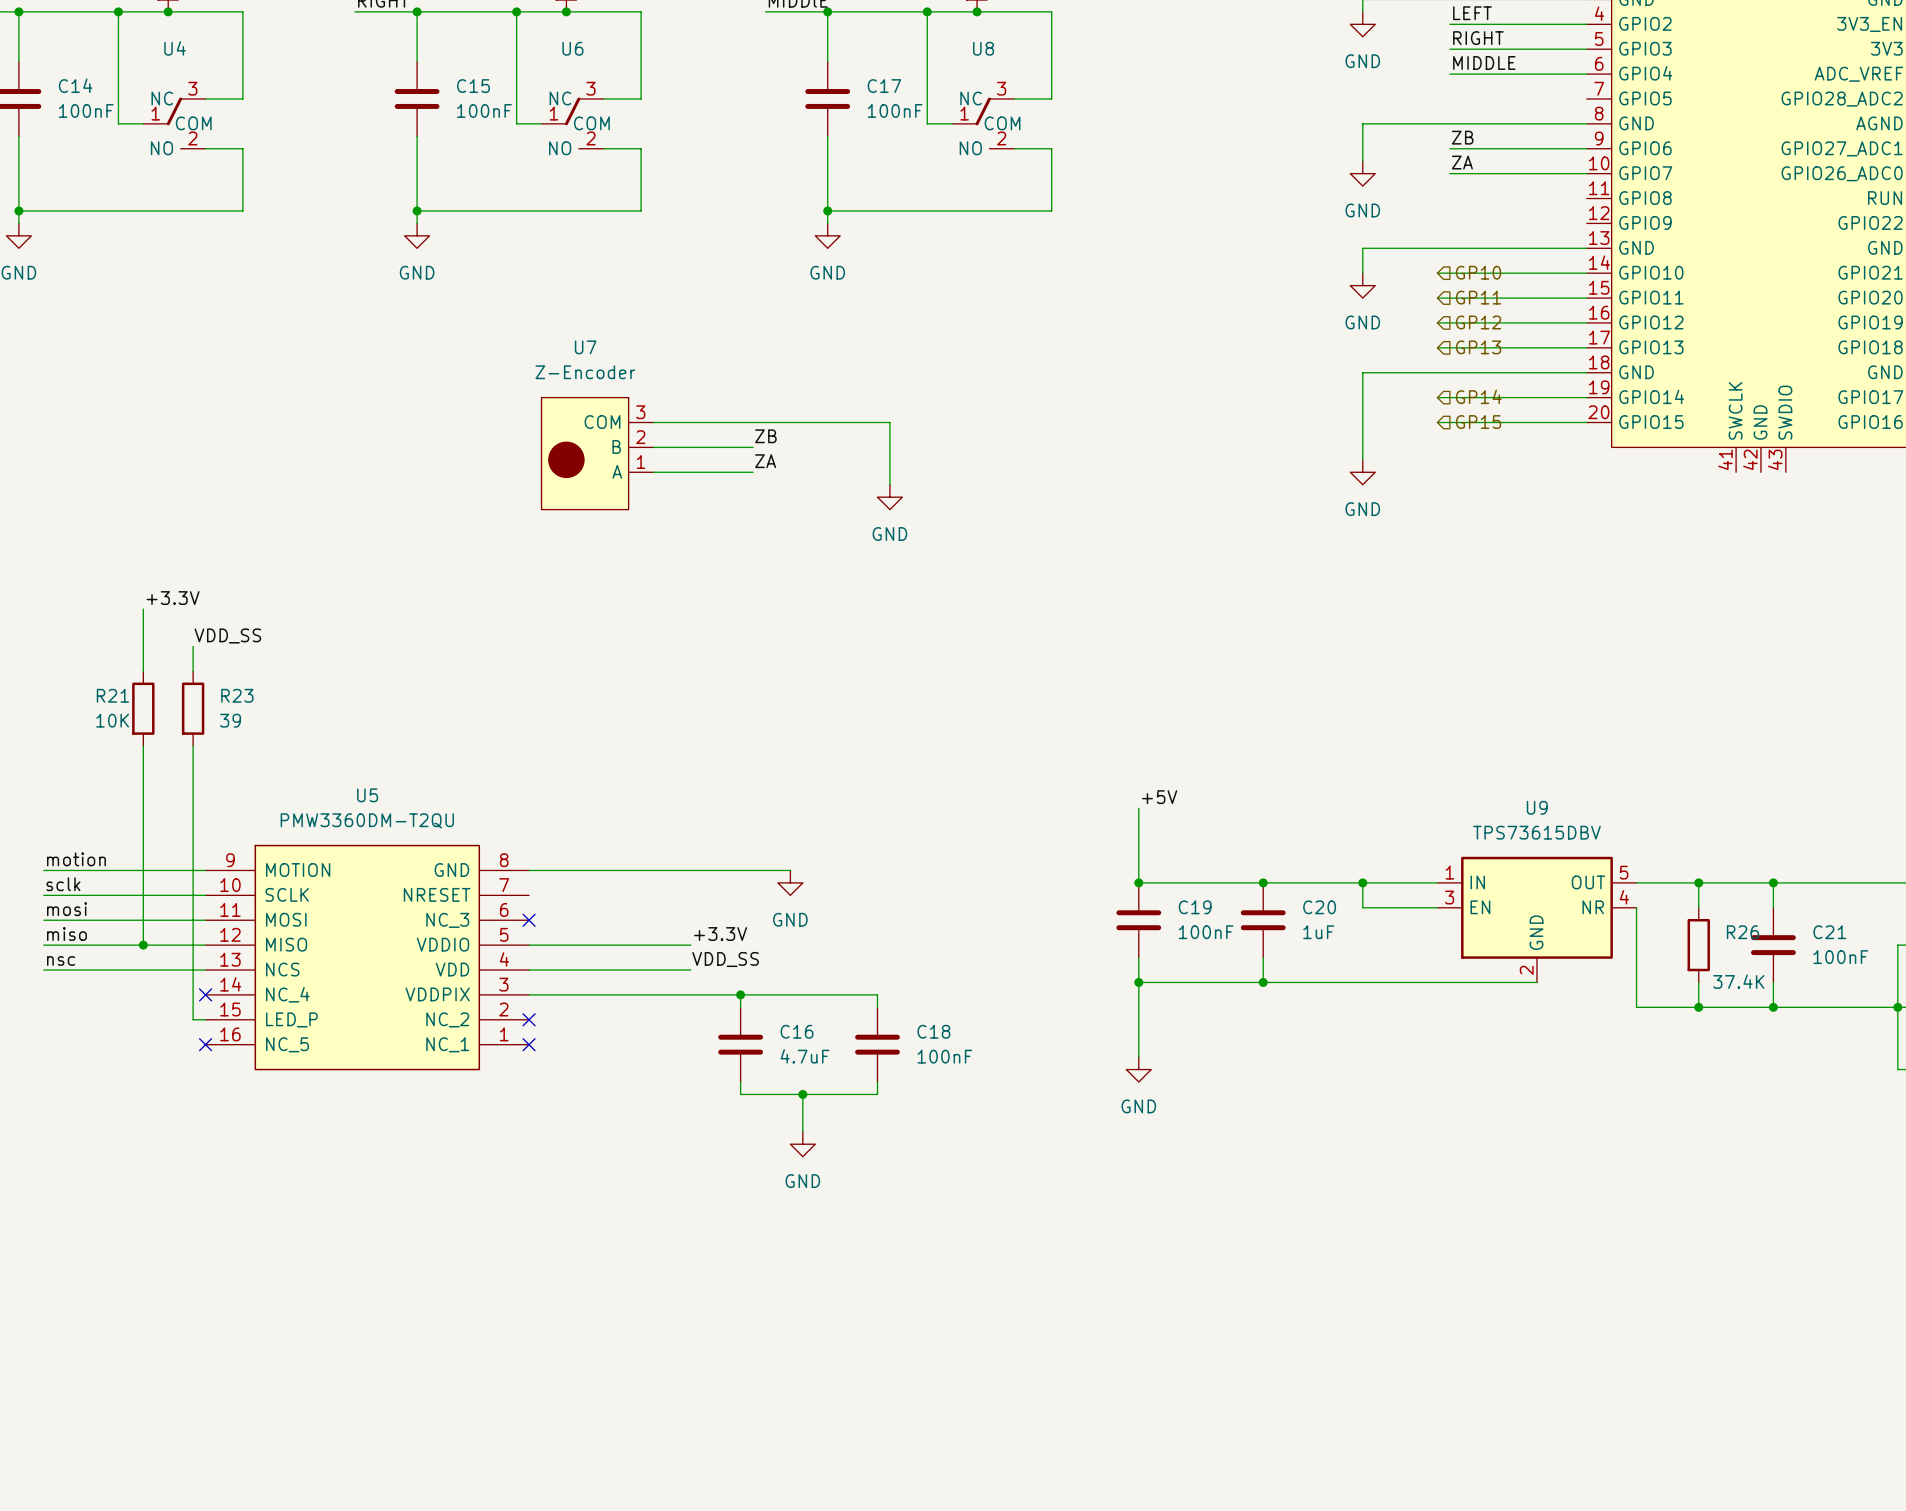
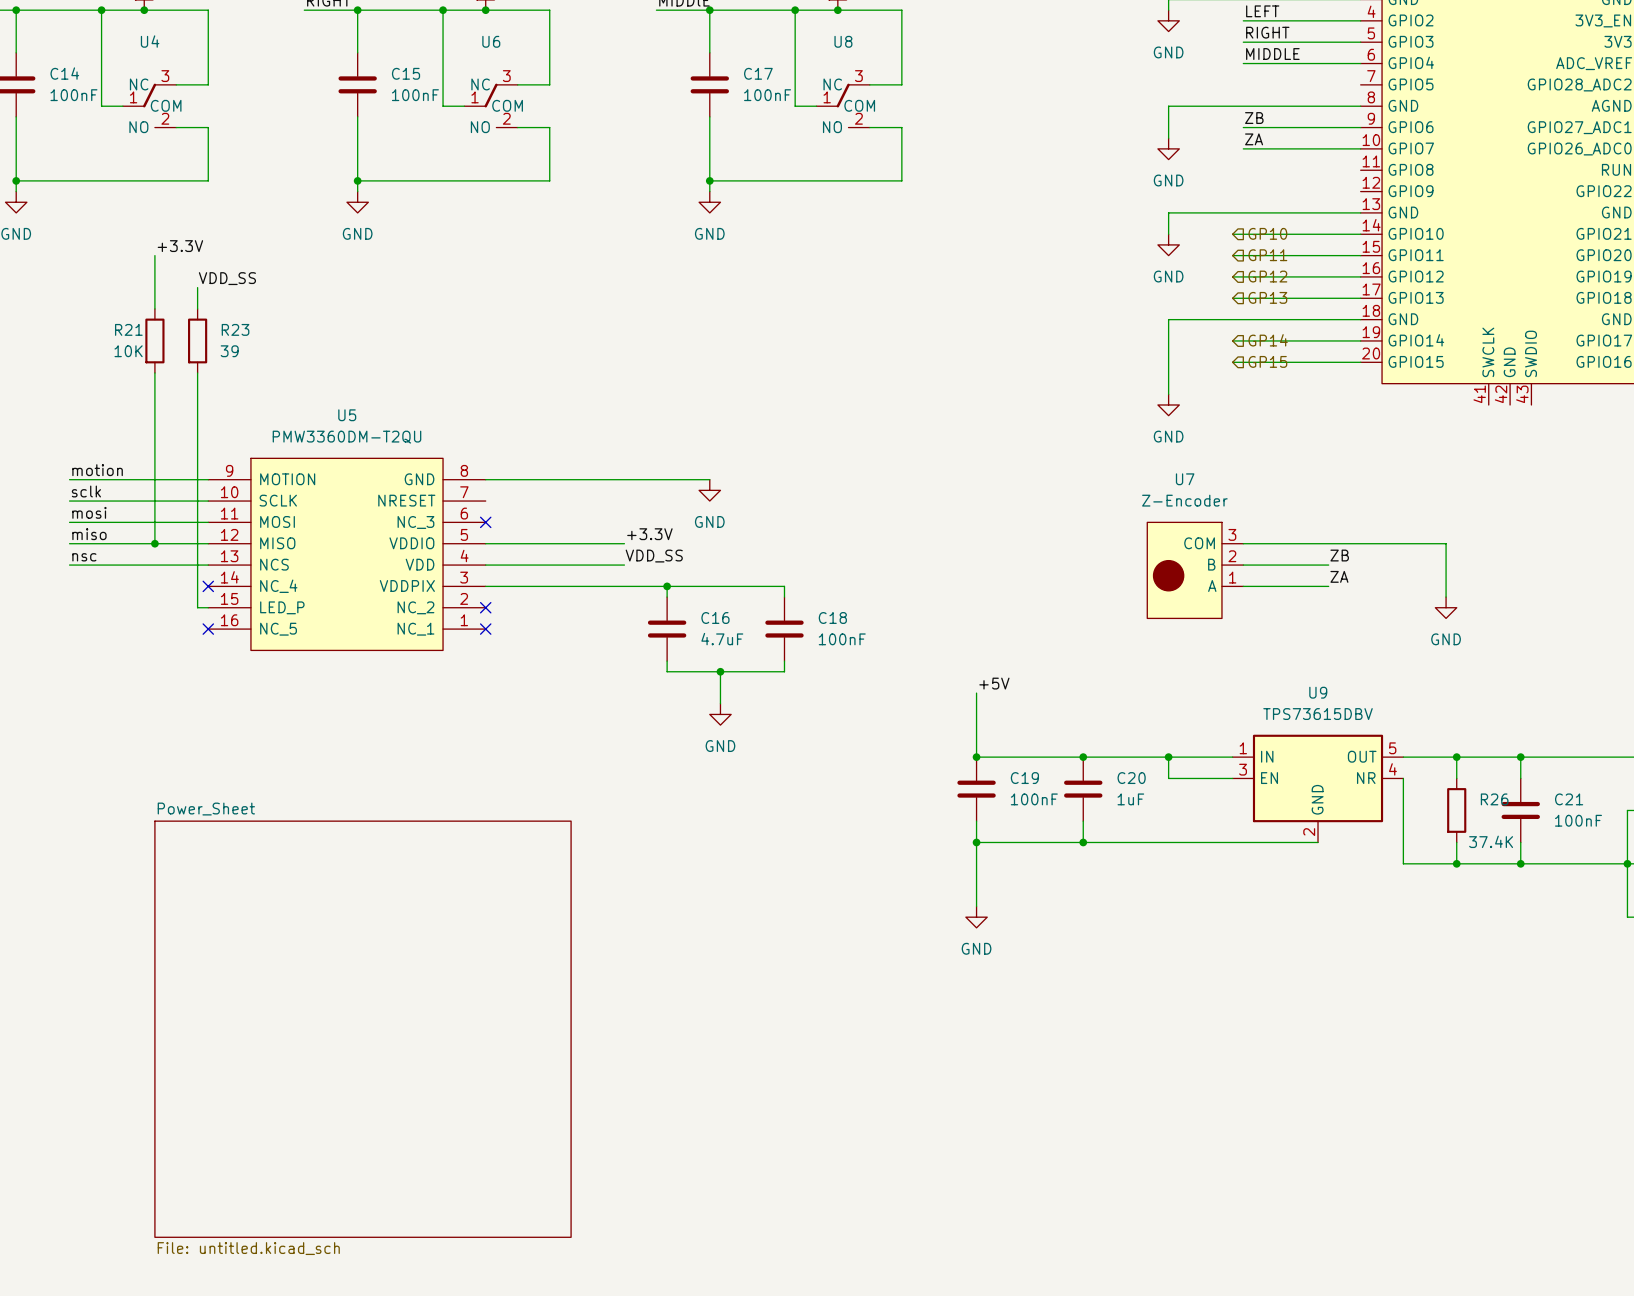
label: none -> +3.3V (180, 246)
wire: none -> (154, 255) (154, 308)
label: none -> VDD_SS (227, 278)
wire: none -> (197, 287) (197, 308)
wire: (653, 422) (889, 422) (889, 484) -> none
wire: none -> (154, 372) (154, 543)
wire: none -> (197, 372) (197, 607) (208, 607)
label: ZB (765, 436) -> none
wire: (653, 447) (753, 447) -> none
U7 position: (597, 453) -> (1195, 570)
label: ZA (765, 461) -> none
wire: (653, 472) (753, 472) -> none
power symbol position: GND (889, 497) -> GND (709, 490)
label: none -> motion (97, 470)
wire: none -> (69, 479) (208, 479)
wire: none -> (485, 479) (709, 479)
label: none -> sclk (86, 491)
wire: none -> (69, 501) (208, 501)
label: none -> mosi (89, 512)
label: +3.3V (173, 598) -> none
wire: none -> (69, 522) (208, 522)
wire: (143, 609) (143, 671) -> none
no-connect mark: none -> (485, 522)
label: none -> miso (89, 534)
label: none -> +3.3V (649, 534)
junction: none -> (154, 543)
wire: none -> (485, 543) (624, 543)
wire: none -> (1243, 543) (1446, 543) (1446, 597)
label: VDD_SS (227, 635) -> none
wire: (193, 646) (193, 671) -> none
label: none -> ZB (1339, 555)
label: none -> VDD_SS (654, 556)
label: none -> nsc (84, 557)
wire: none -> (485, 565) (624, 565)
wire: none -> (1243, 565) (1328, 565)
label: none -> ZA (1339, 576)
no-connect mark: none -> (208, 586)
wire: none -> (485, 586) (784, 586) (784, 597)
wire: none -> (667, 586) (667, 597)
junction: none -> (667, 586)
wire: none -> (1243, 586) (1328, 586)
R21 position: (143, 708) -> (154, 340)
R23 position: (193, 708) -> (197, 340)
no-connect mark: none -> (485, 607)
power symbol: none -> GND (1446, 607)
no-connect mark: none -> (208, 629)
no-connect mark: none -> (485, 629)
wire: (143, 746) (143, 945) -> none
wire: (193, 746) (193, 1019) (205, 1019) -> none
wire: none -> (667, 661) (667, 671) (784, 671) (784, 661)
wire: none -> (720, 671) (720, 703)
junction: none -> (720, 671)
label: motion (76, 859) -> none
wire: (43, 870) (205, 870) -> (69, 543) (208, 543)
wire: (529, 870) (790, 870) -> none
power symbol position: GND (790, 882) -> GND (720, 714)
label: sclk (63, 884) -> none
wire: (43, 895) (205, 895) -> (69, 565) (208, 565)
label: mosi (66, 909) -> none
wire: (43, 920) (205, 920) -> none
no-connect mark: (529, 920) -> none
label: miso (66, 934) -> none
label: +3.3V (720, 934) -> none
wire: (43, 945) (205, 945) -> none
junction: (143, 945) -> none
wire: (529, 945) (690, 945) -> none
U5 position: (367, 957) -> (346, 554)
label: VDD_SS (725, 959) -> none
label: nsc (61, 960) -> none
wire: (43, 970) (205, 970) -> none
wire: (529, 970) (690, 970) -> none
no-connect mark: (205, 994) -> none
wire: (529, 994) (877, 994) (877, 1007) -> none
wire: (740, 994) (740, 1007) -> none
junction: (740, 994) -> none
no-connect mark: (529, 1019) -> none
no-connect mark: (205, 1044) -> none
no-connect mark: (529, 1044) -> none
C16 position: (740, 1044) -> (667, 629)
C18 position: (877, 1044) -> (784, 629)
wire: (740, 1082) (740, 1094) (877, 1094) (877, 1082) -> none
wire: (802, 1094) (802, 1131) -> none
junction: (802, 1094) -> none
power symbol: GND (802, 1144) -> none
sheet Power_Sheet: none -> File: untitled.kicad_sch (363, 1029)

